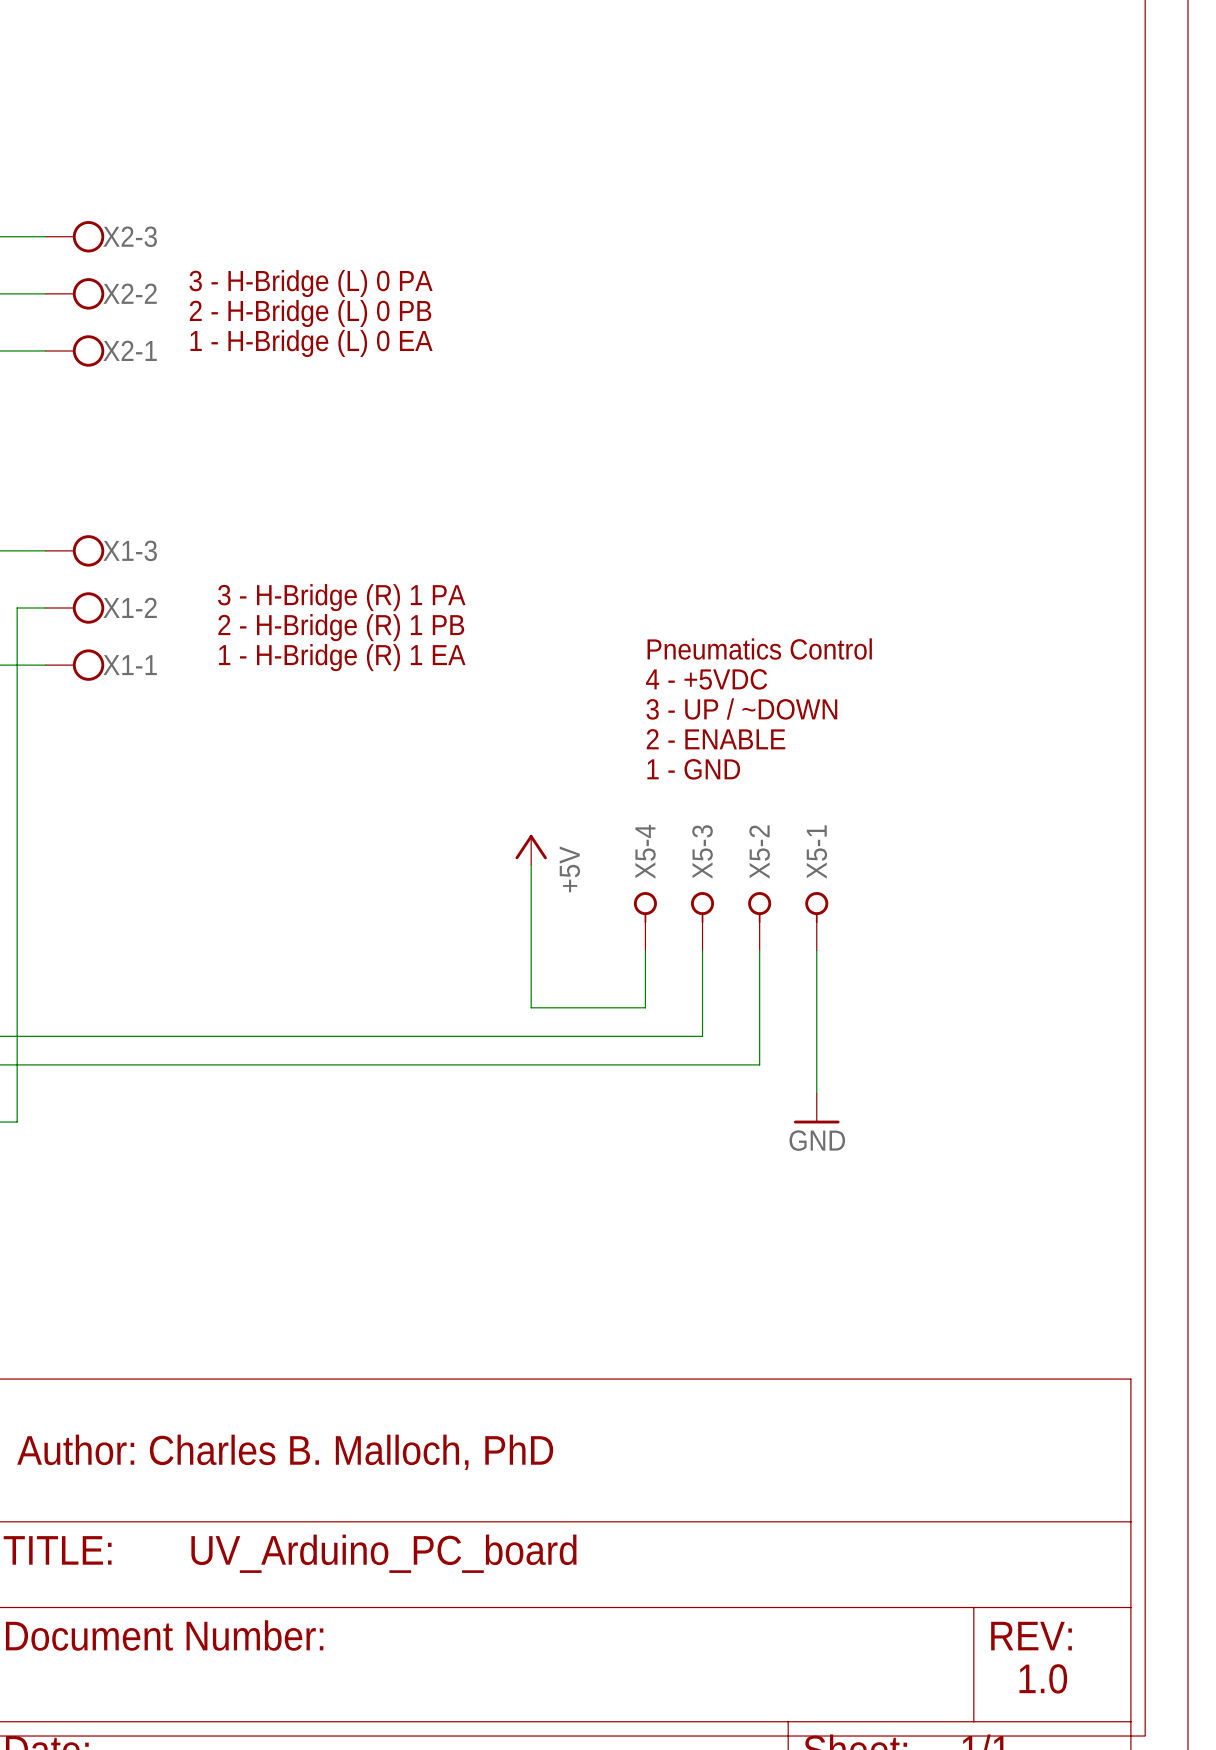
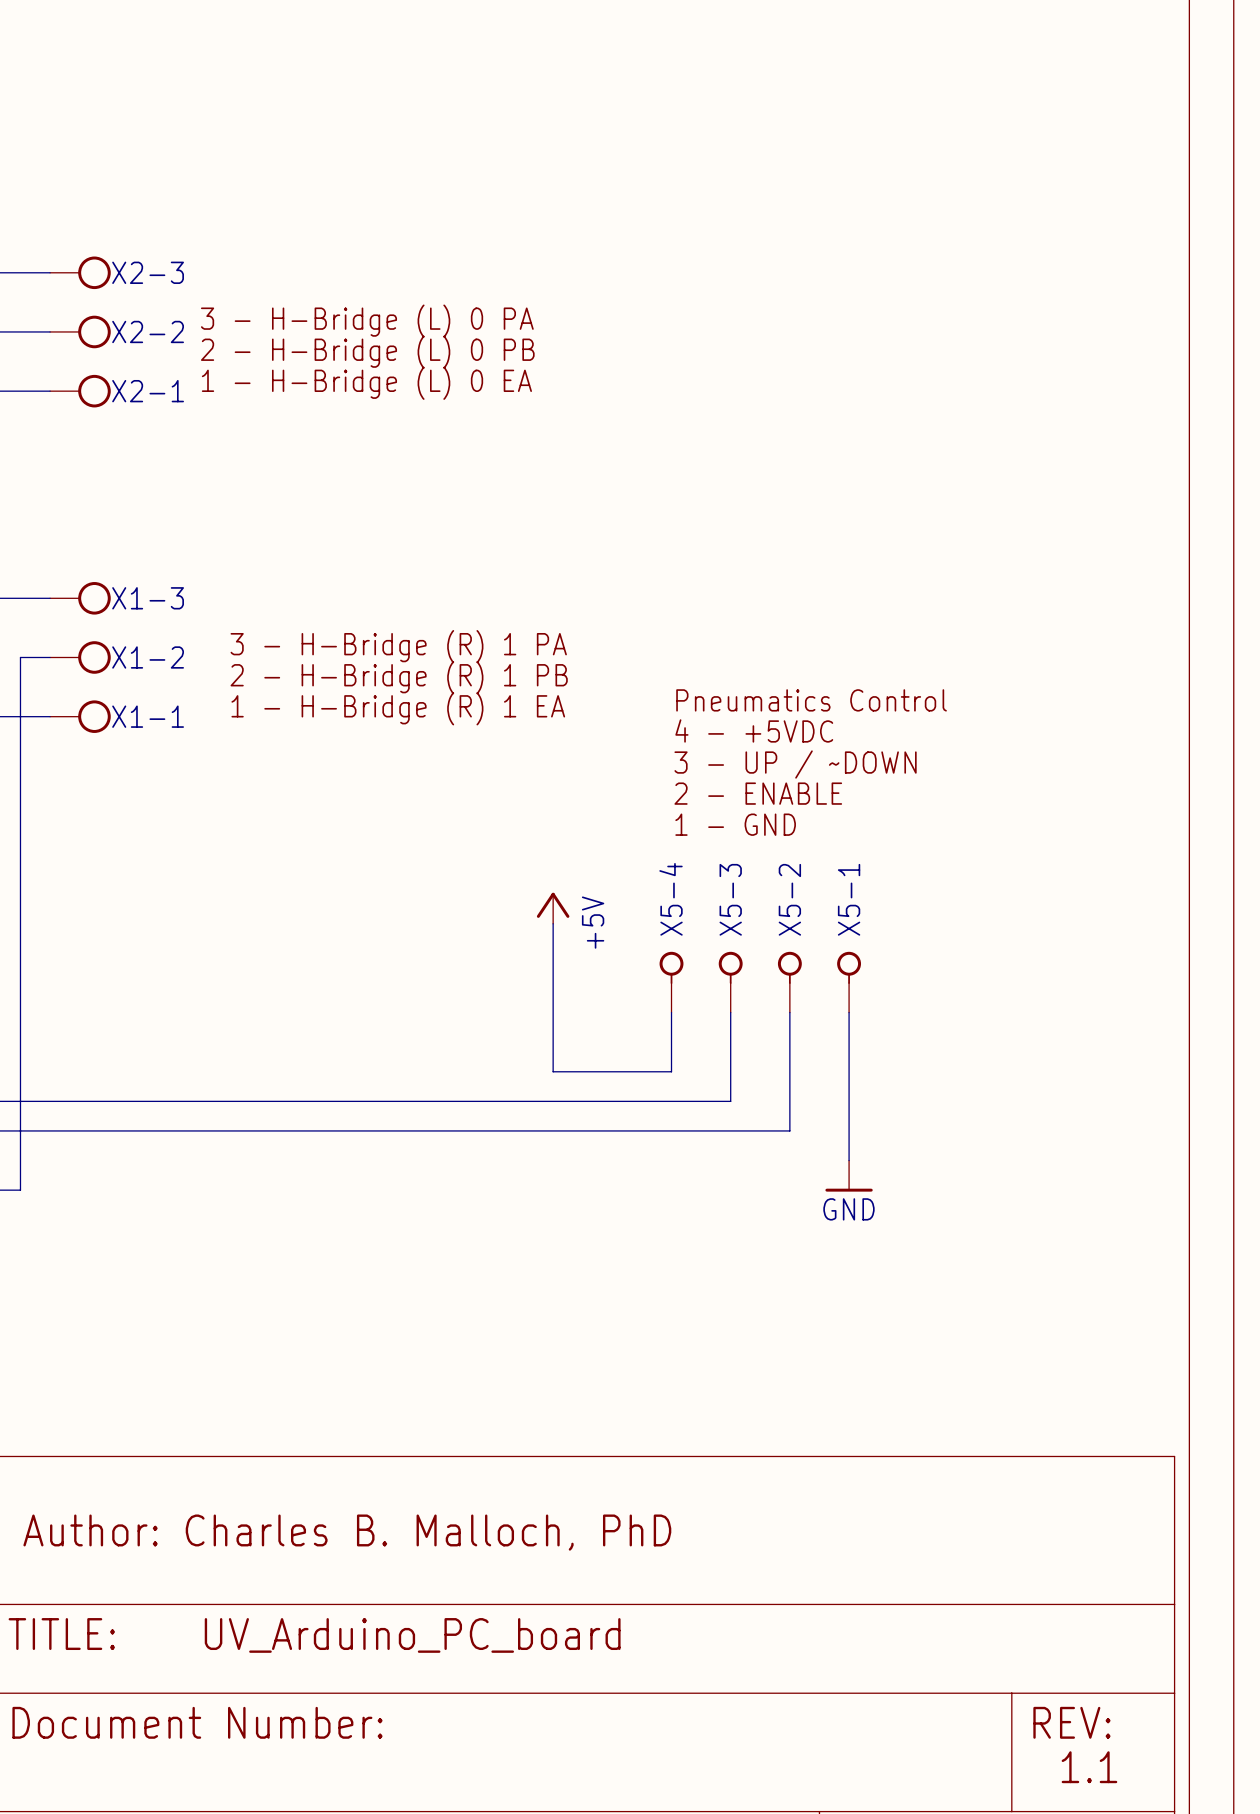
text: 1.0 (1043, 1678) -> 1.1 (1089, 1767)

